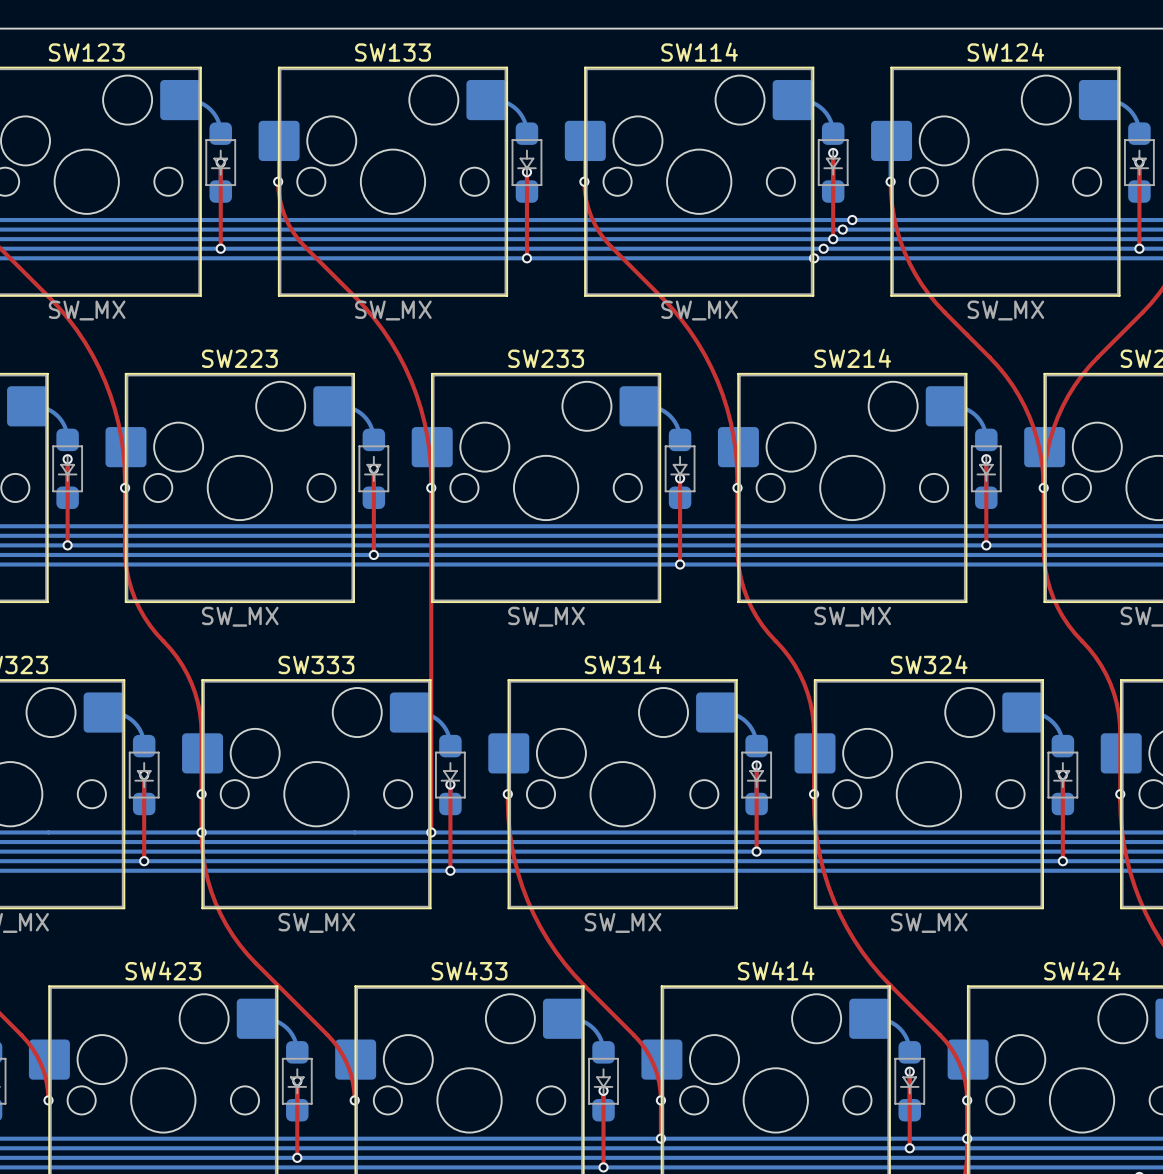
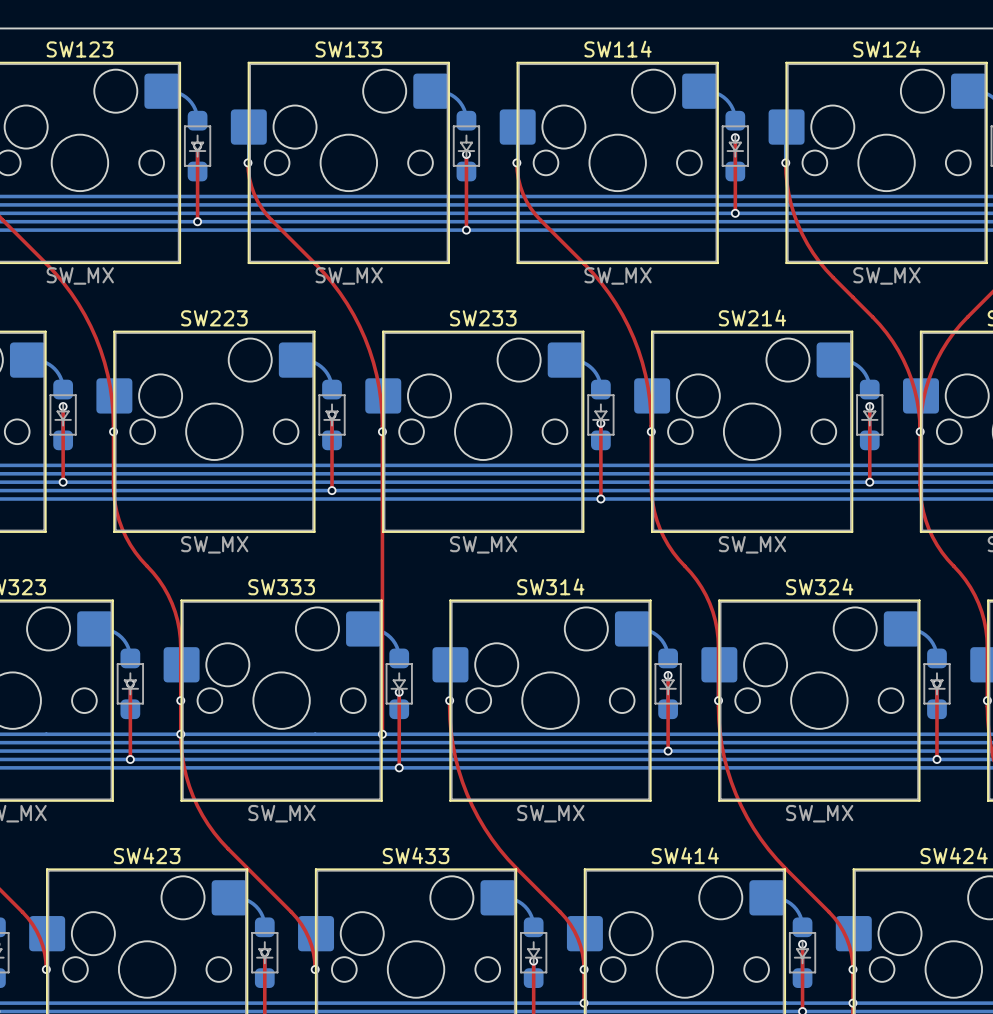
via: (852, 220) -> none
via: (842, 229) -> none
via: (823, 248) -> none
via: (814, 258) -> none

